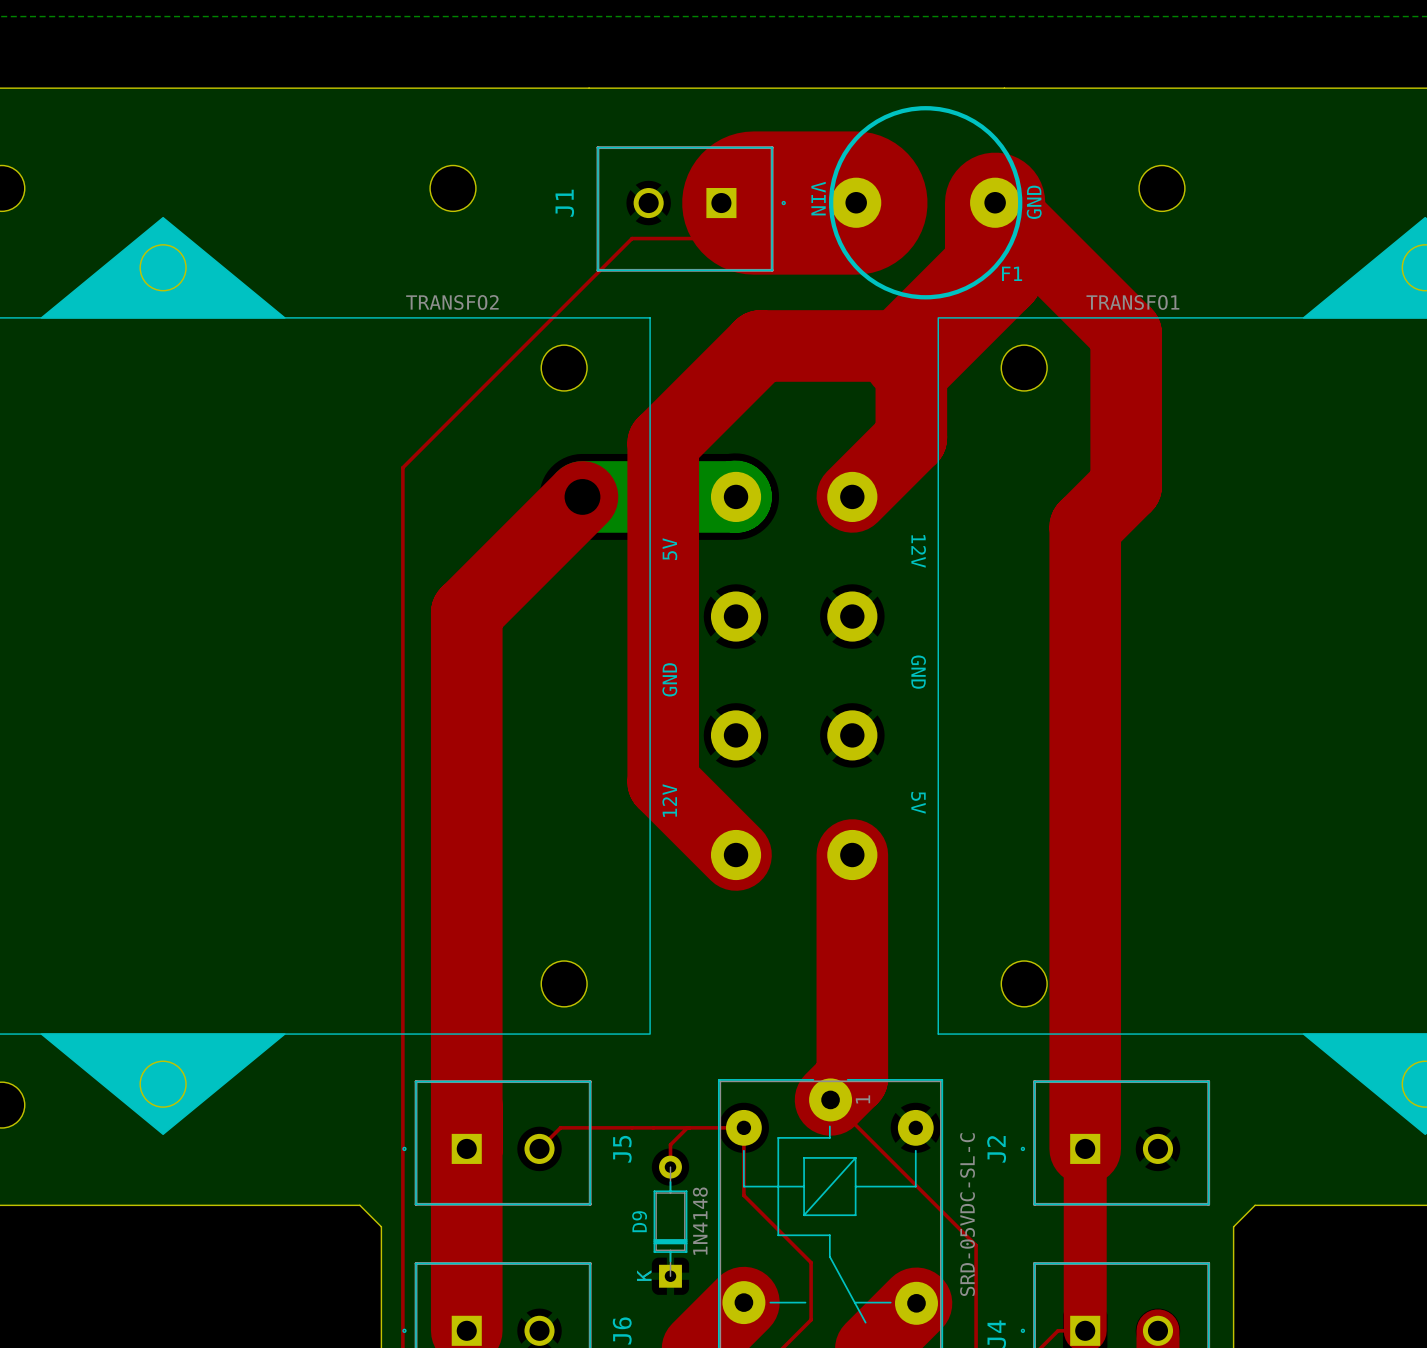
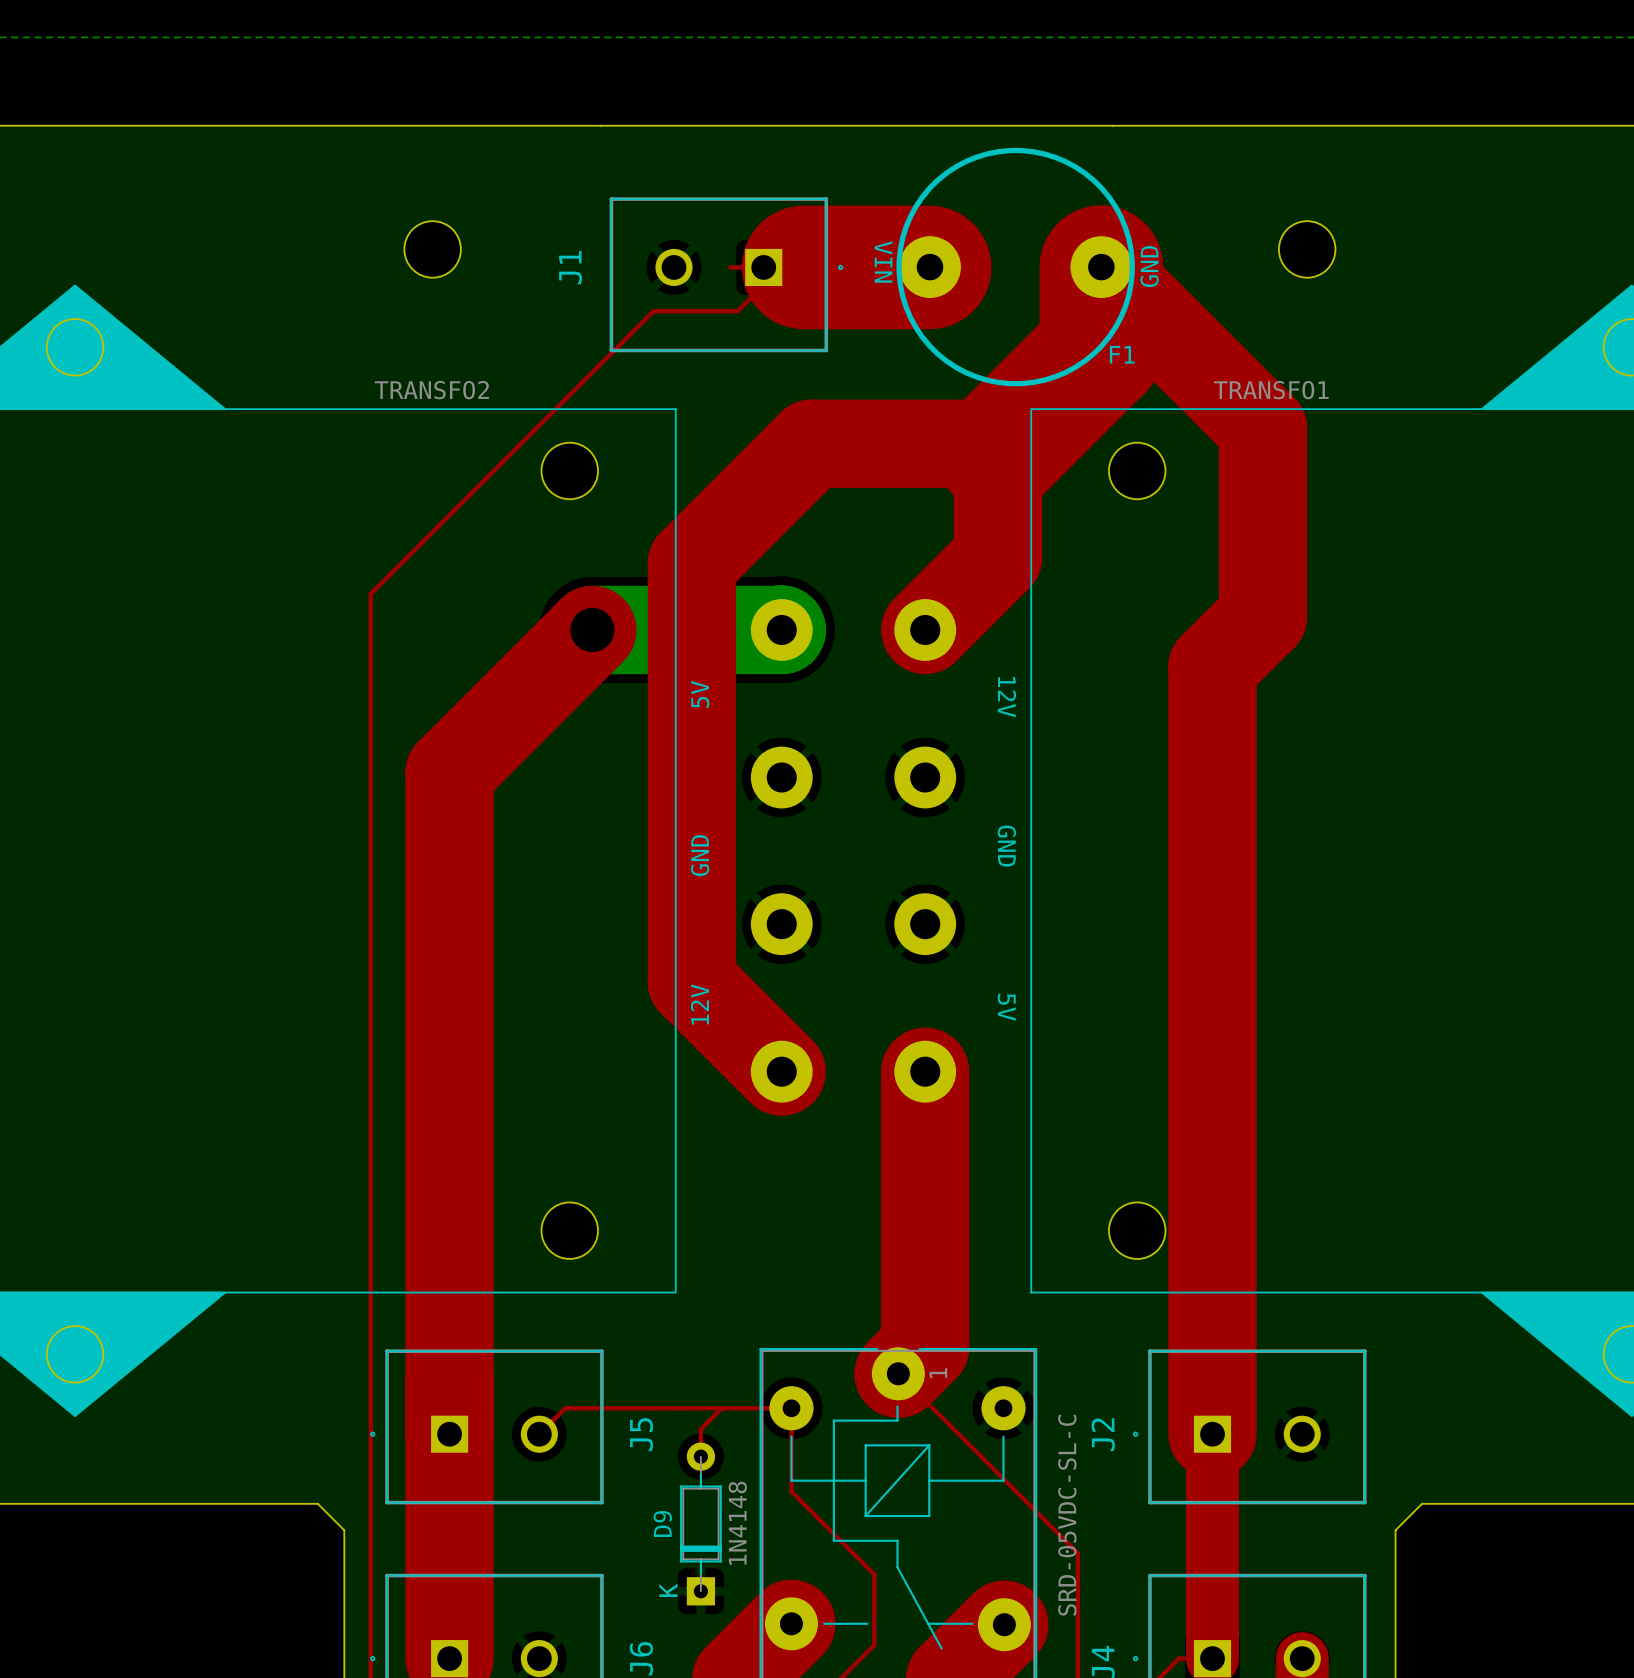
top track: none -> (730, 267) (763, 267)
top track width: thick (753, 203) (855, 203) -> thin (803, 267) (929, 267)

